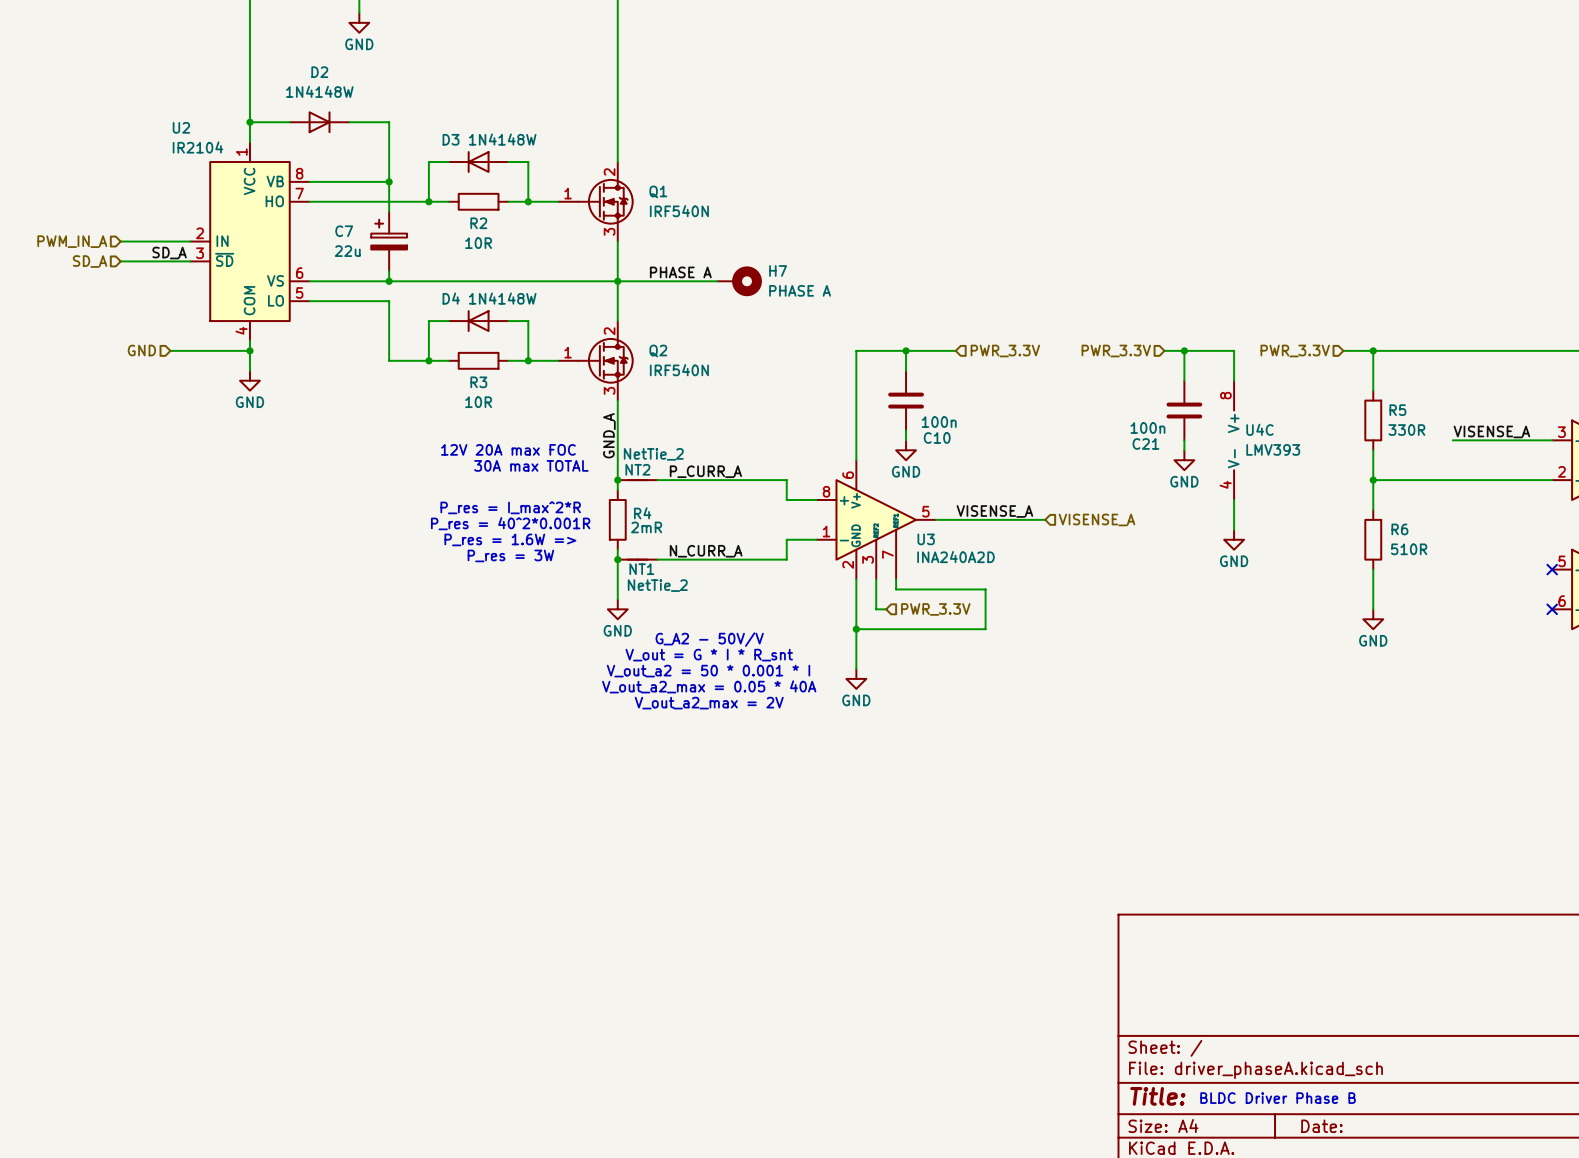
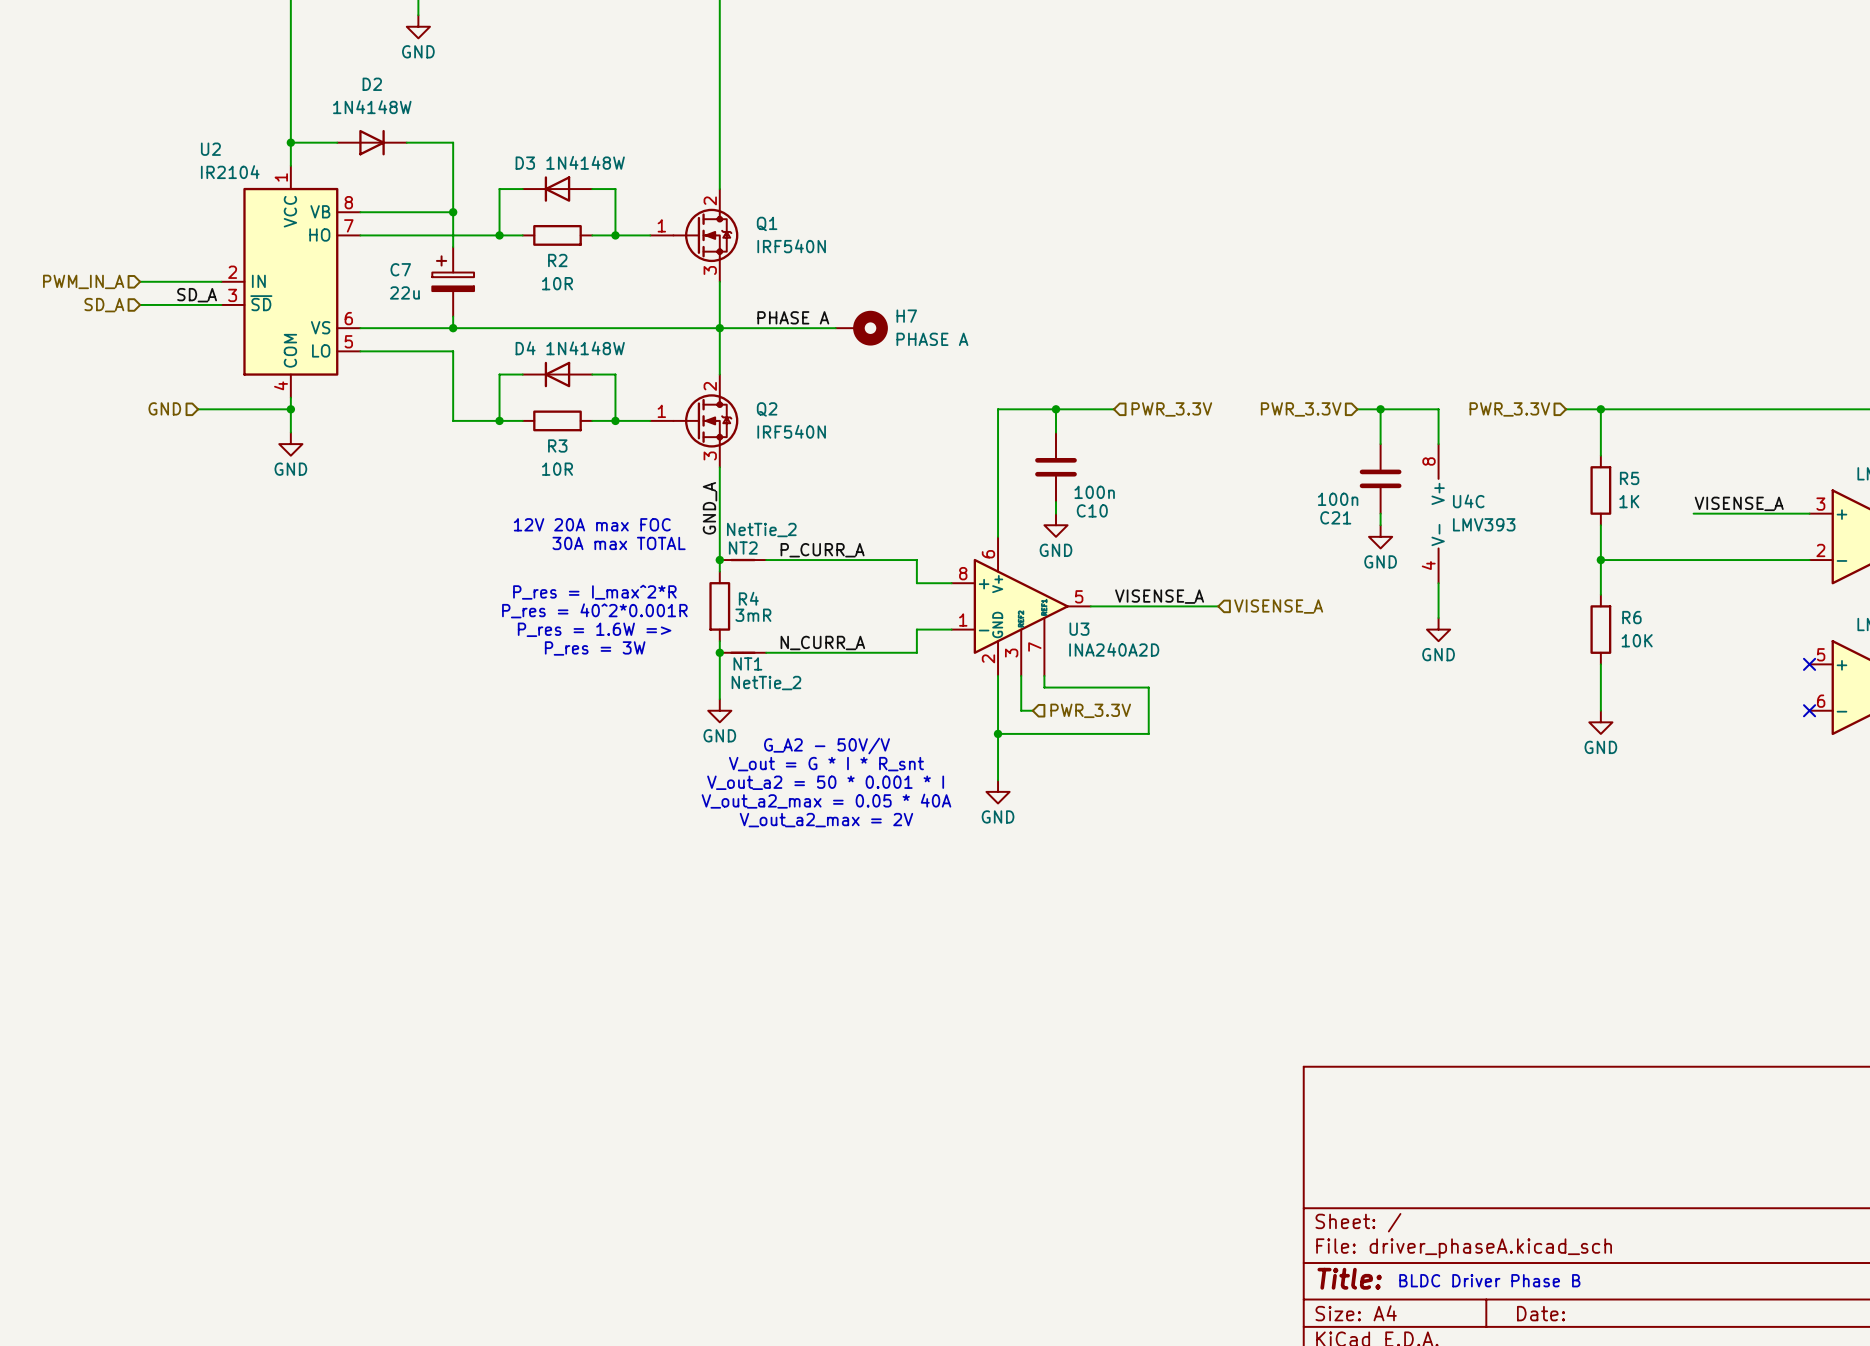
R5 value: 330R (1406, 430) -> 1K (1629, 501)
R4 value: 2mR (646, 527) -> 3mR (753, 615)
R6 value: 510R (1409, 549) -> 10K (1637, 640)

